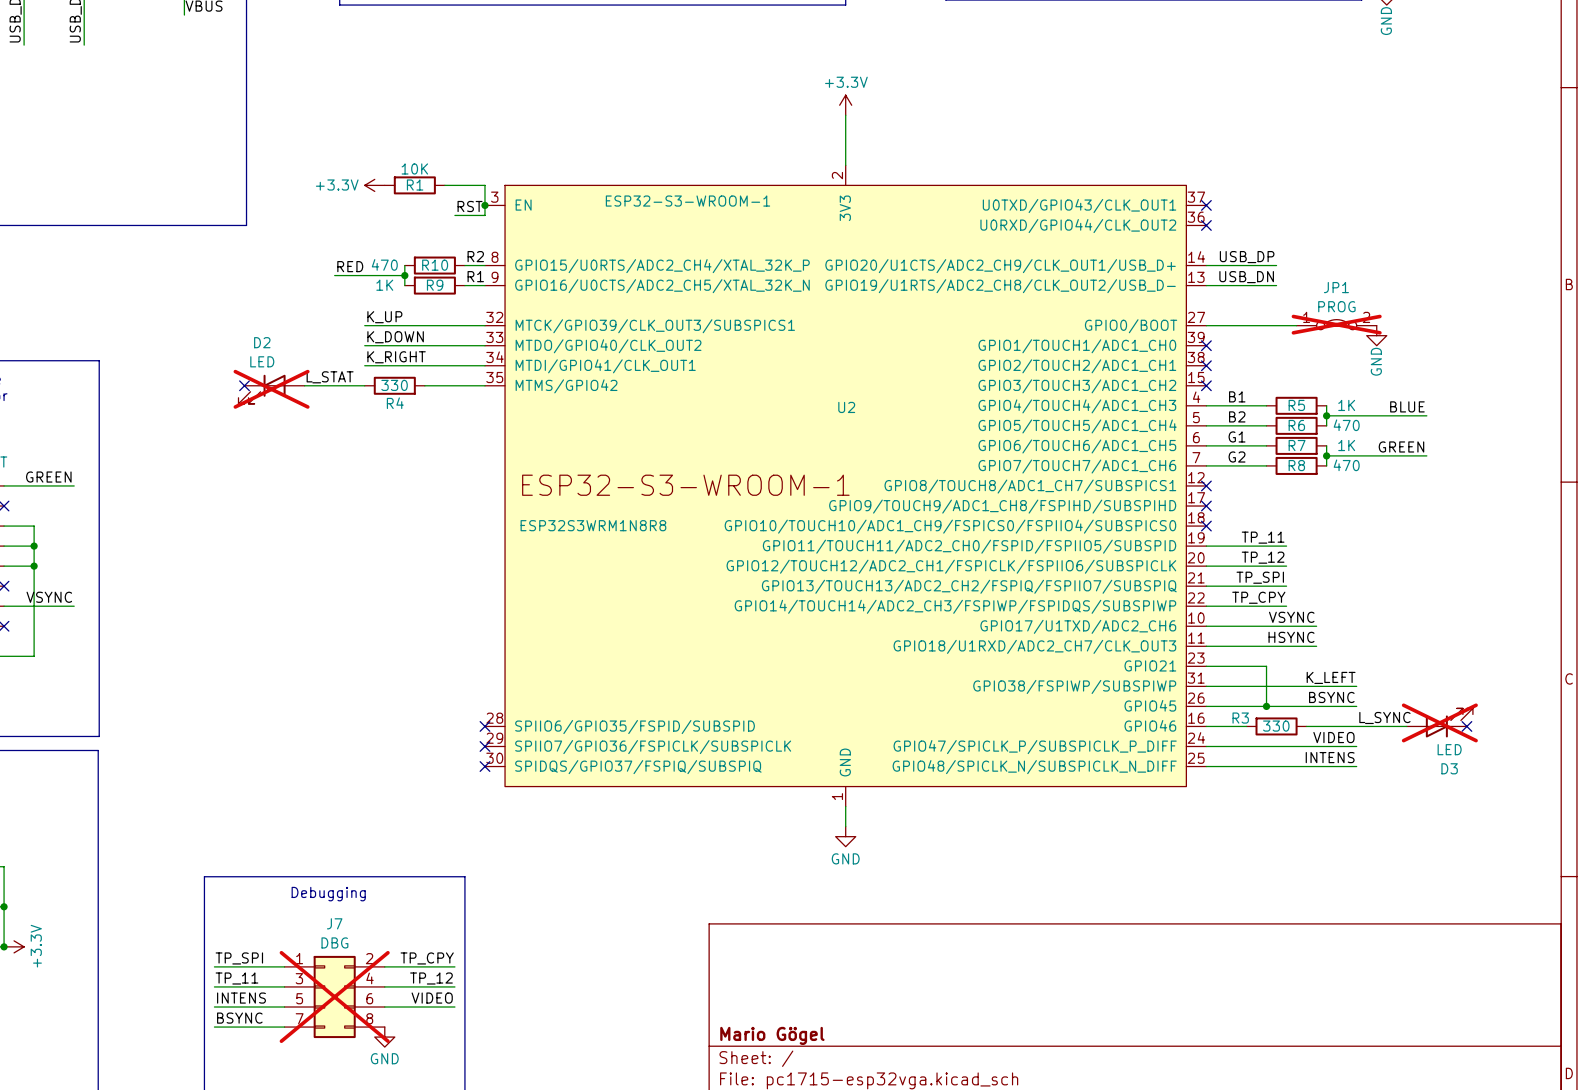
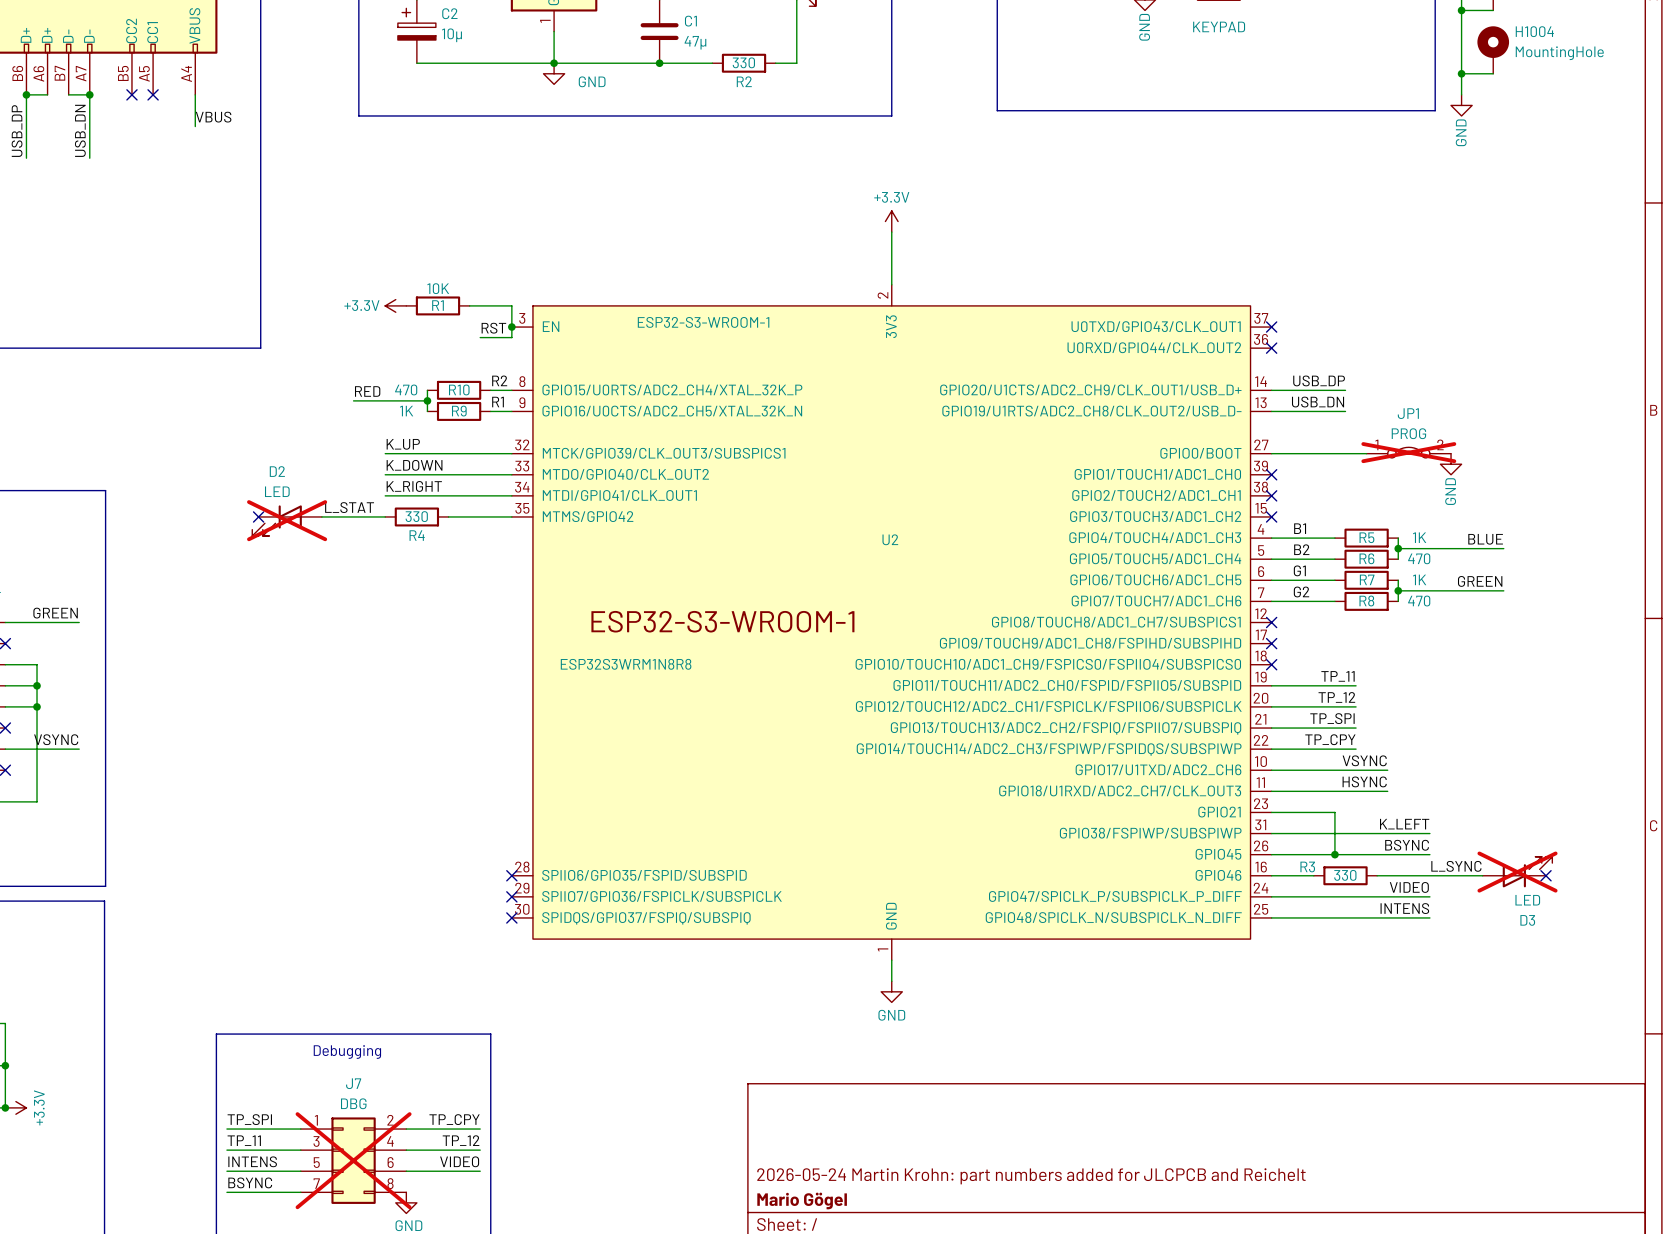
title block: none -> 2026-05-24 Martin Krohn: part numbers added for JLCPCB and Reichelt (1031, 1176)

